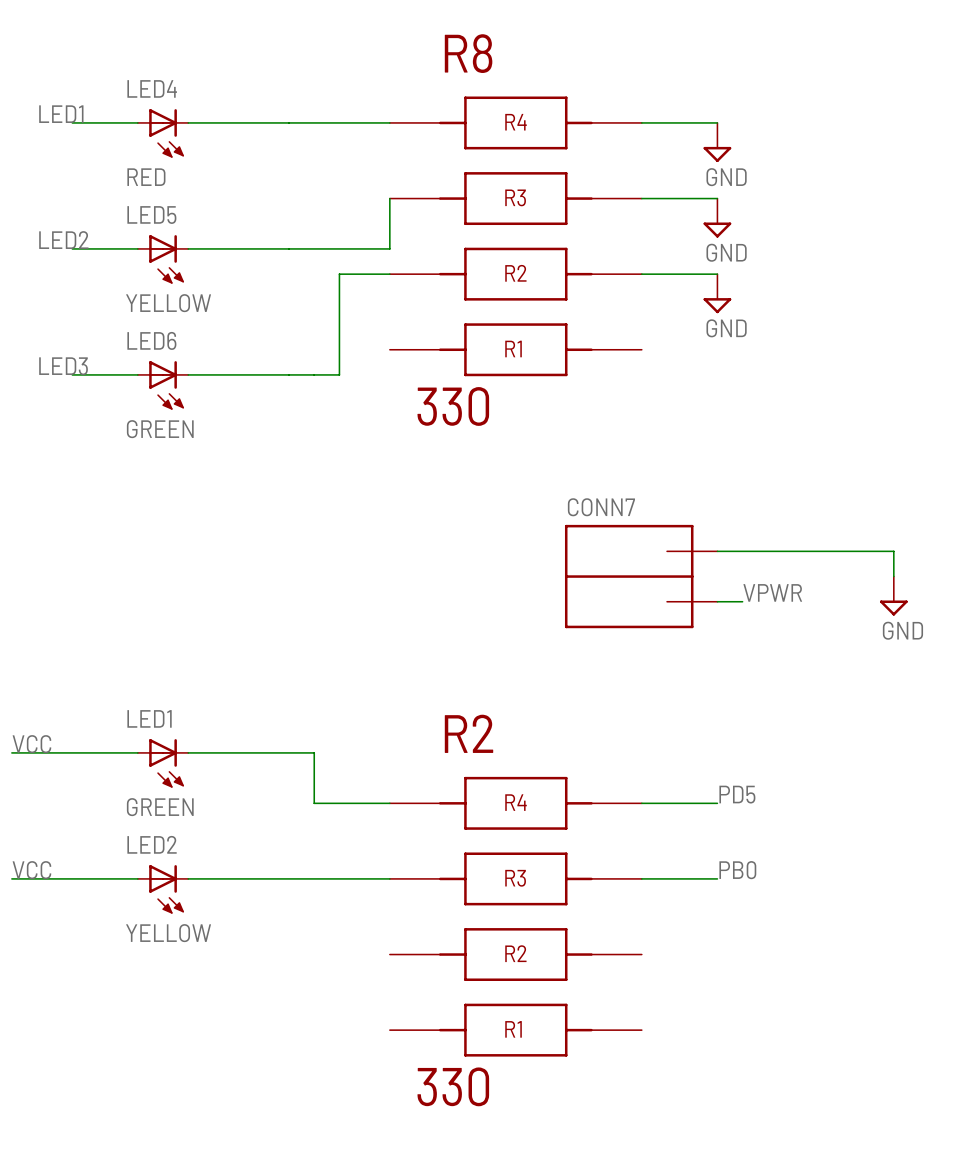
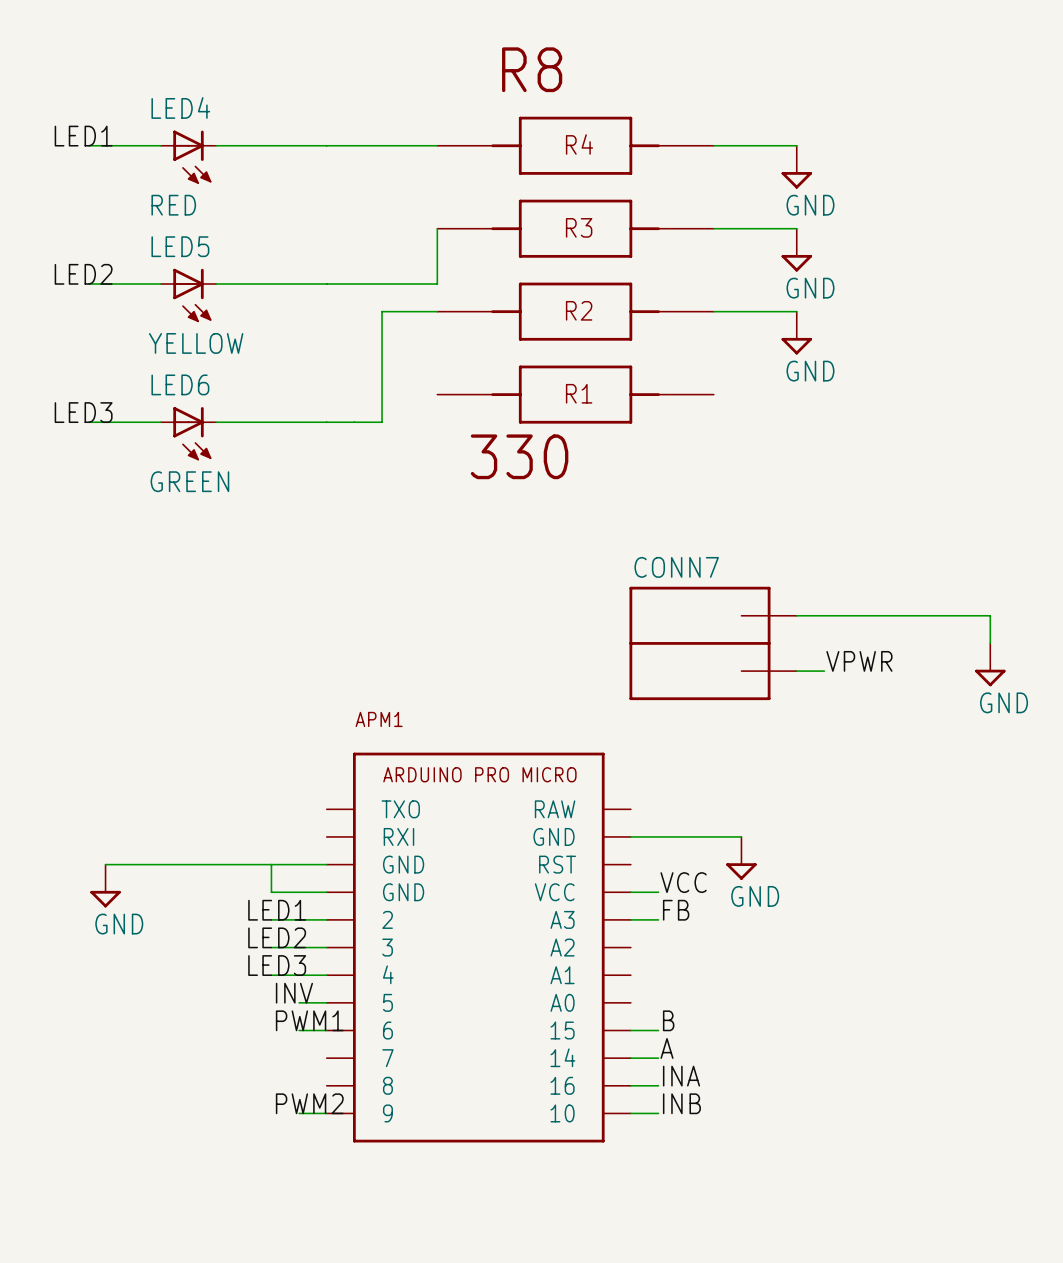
label: VCC (31, 744) -> none
wire: (11, 752) (137, 752) -> none
wire: (188, 752) (314, 752) (314, 803) (389, 803) -> none
wire: none -> (630, 836) (741, 836)
LED1: GREEN (163, 763) -> none
power symbol: none -> GND (741, 858)
wire: none -> (105, 864) (326, 864)
wire: none -> (271, 864) (271, 892) (326, 892)
label: none -> VCC (683, 882)
label: PD5 (737, 794) -> none
power symbol: none -> GND (105, 886)
wire: (641, 803) (717, 803) -> none
label: none -> LED1 (277, 910)
label: none -> FB (676, 910)
wire: none -> (271, 919) (326, 919)
wire: none -> (630, 919) (658, 919)
label: none -> LED2 (277, 937)
APM1: none -> (478, 947)
label: VCC (31, 870) -> none
label: none -> LED3 (277, 965)
label: PB0 (737, 870) -> none
wire: (11, 878) (137, 878) -> none
wire: (188, 878) (238, 878) -> (271, 947) (326, 947)
wire: (289, 878) (389, 878) -> none
wire: (641, 878) (717, 878) -> none
LED2: YELLOW (163, 889) -> none
label: none -> INV (294, 993)
wire: none -> (299, 1002) (326, 1002)
R2: 330 (515, 916) -> none
label: none -> PWM1 (309, 1020)
label: none -> B (668, 1020)
wire: none -> (299, 1030) (326, 1030)
wire: none -> (630, 1030) (658, 1030)
label: none -> A (666, 1048)
label: none -> INA (681, 1076)
wire: none -> (630, 1085) (658, 1085)
label: none -> PWM2 (309, 1103)
label: none -> INB (681, 1103)
wire: none -> (299, 1113) (326, 1113)
wire: none -> (630, 1113) (658, 1113)

